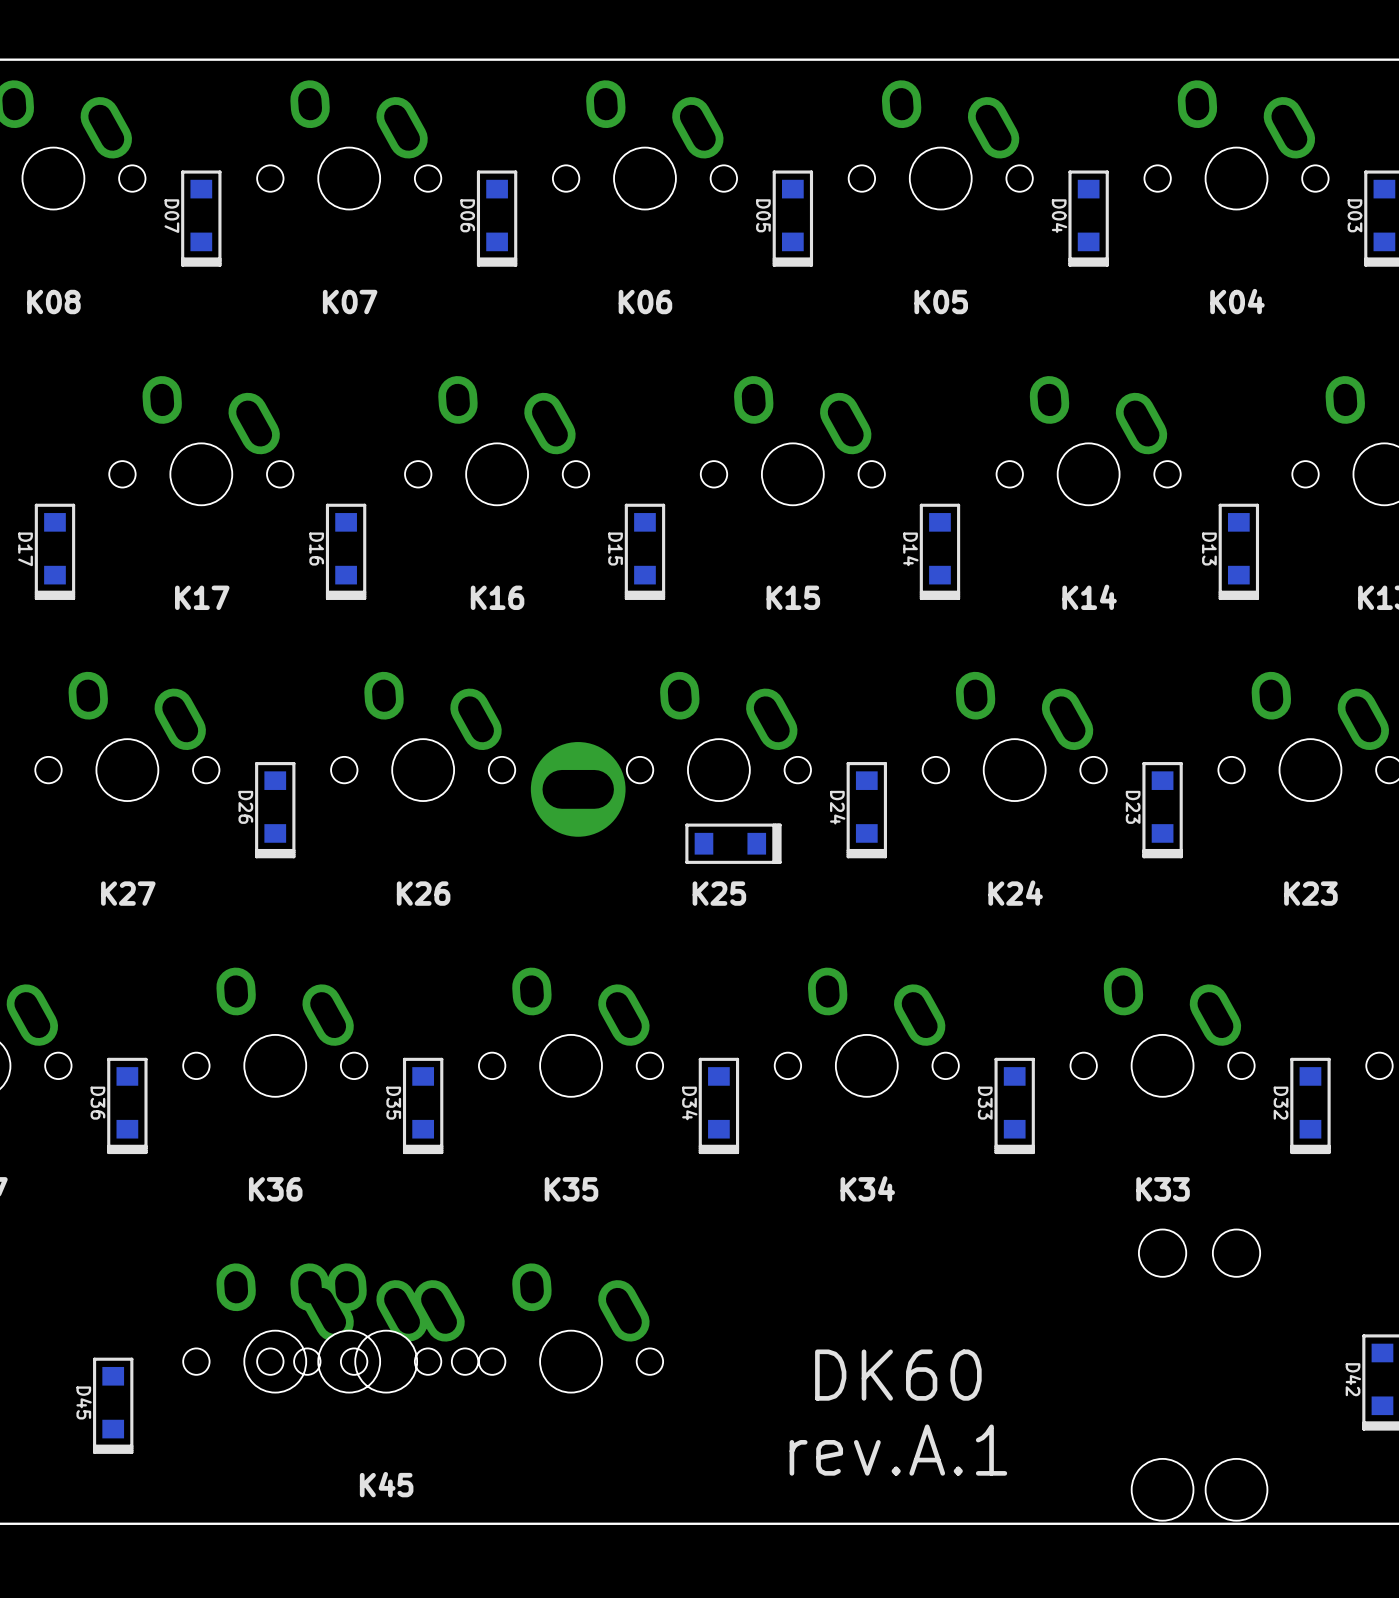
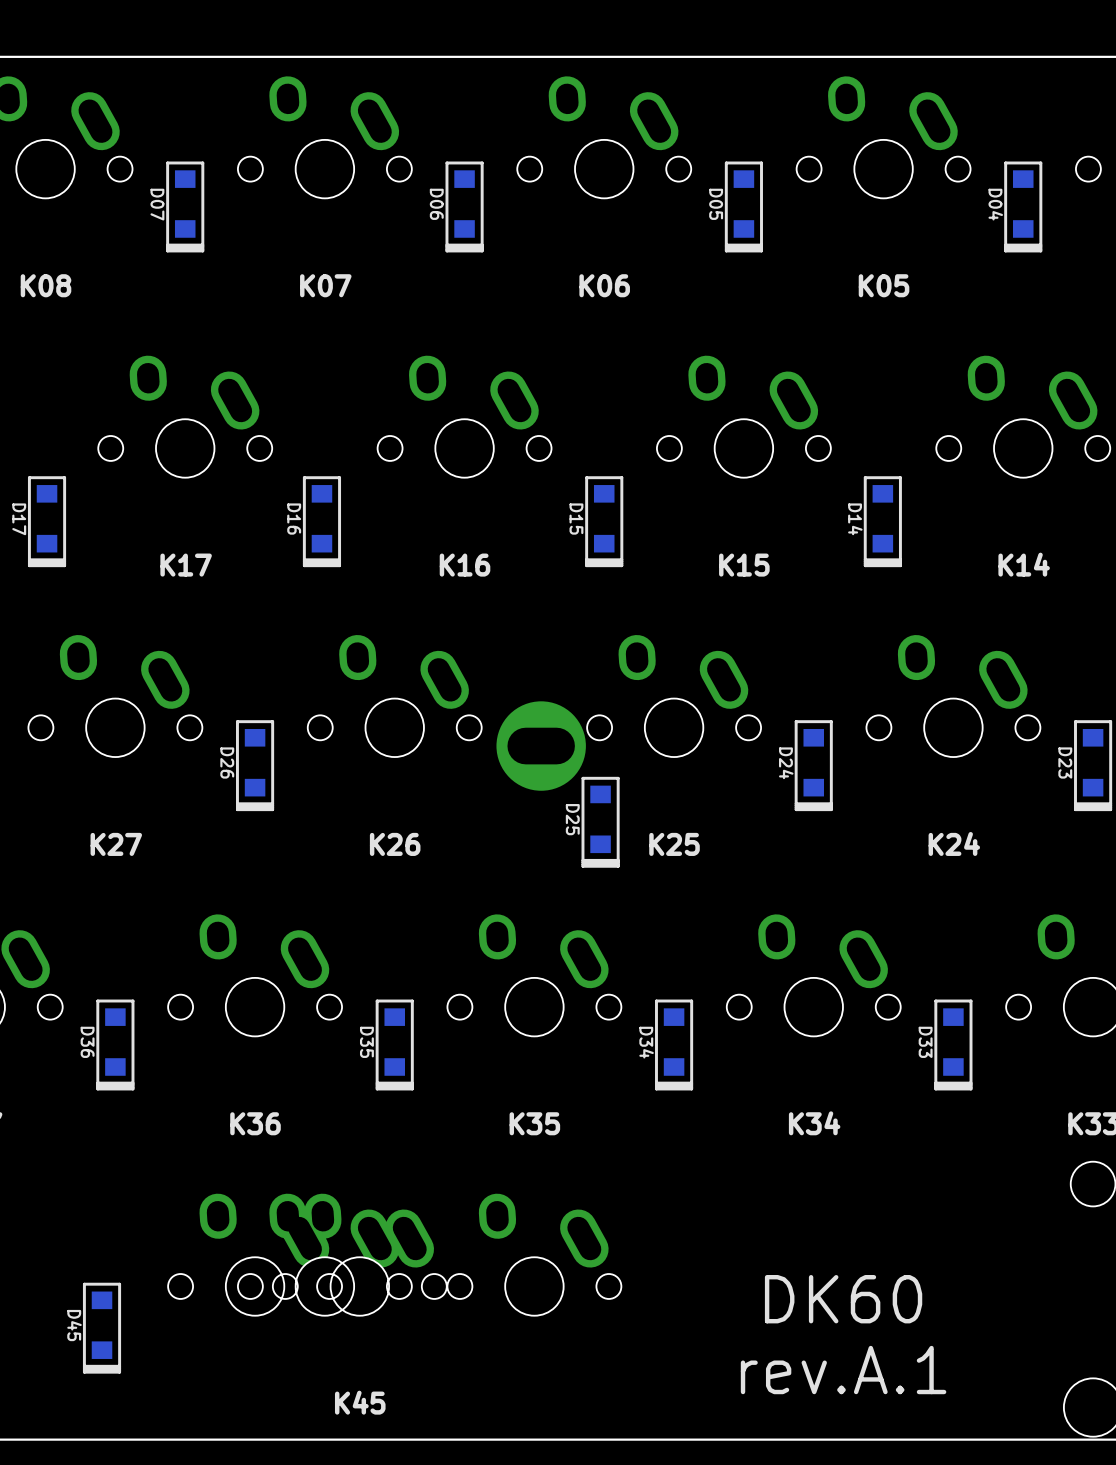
part: (733, 843) -> none
part: none -> D25 (600, 822)

